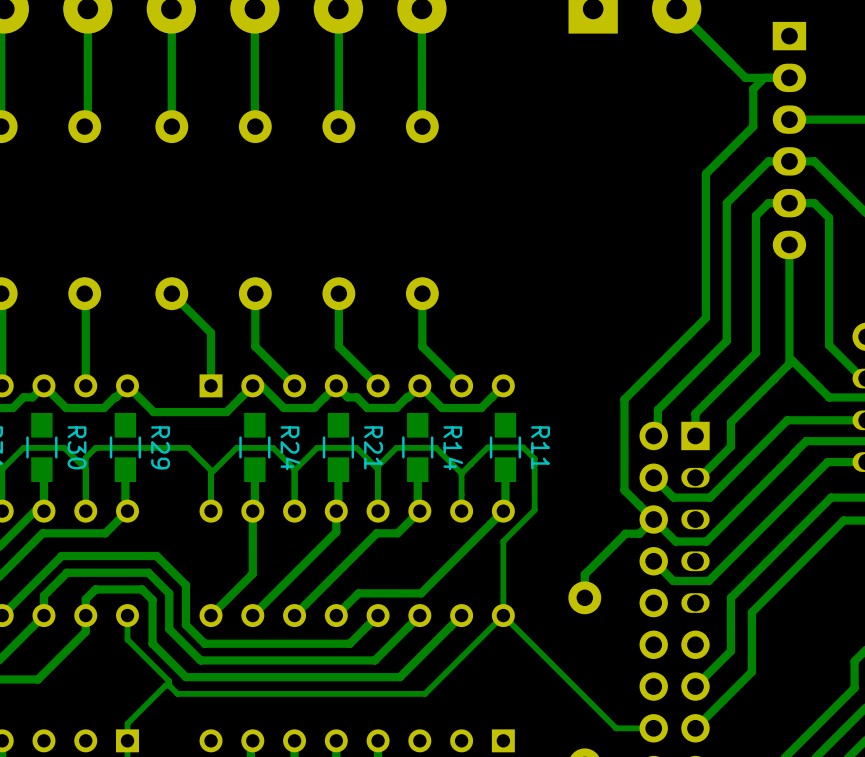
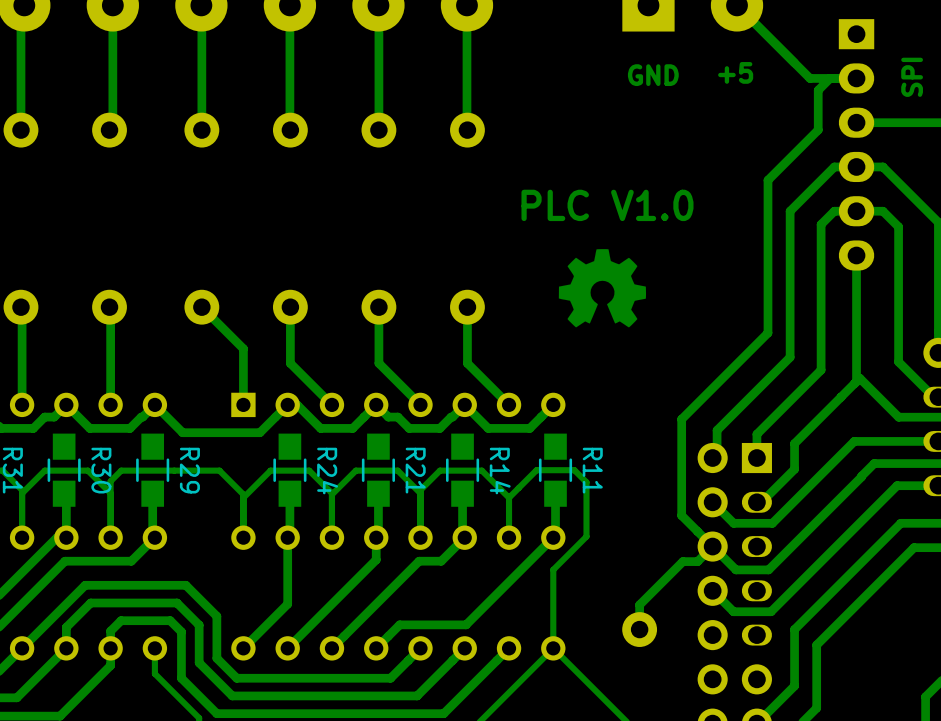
text: none -> +5 (735, 72)
text: none -> GND (653, 75)
text: none -> SPI (912, 77)
text: none -> PLC V1.0 (607, 205)
drawing: none -> [558, 249, 647, 328]

